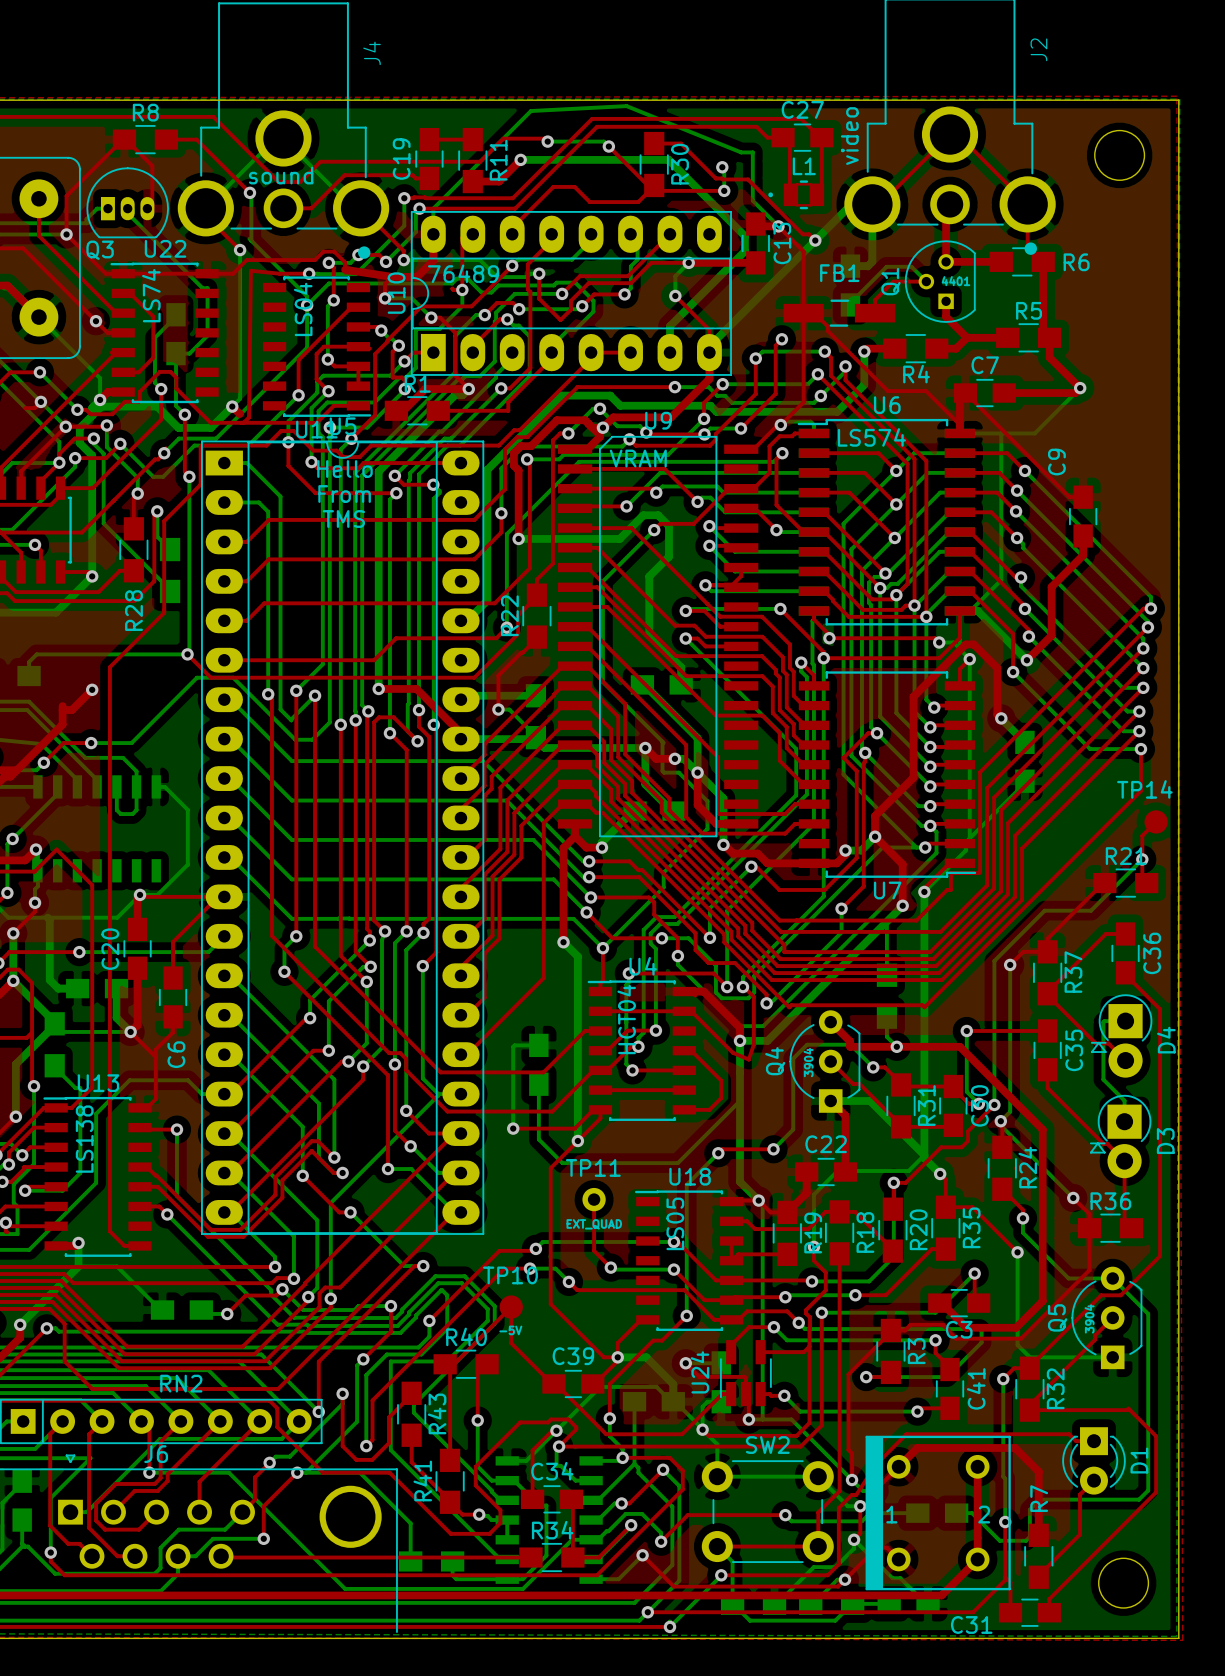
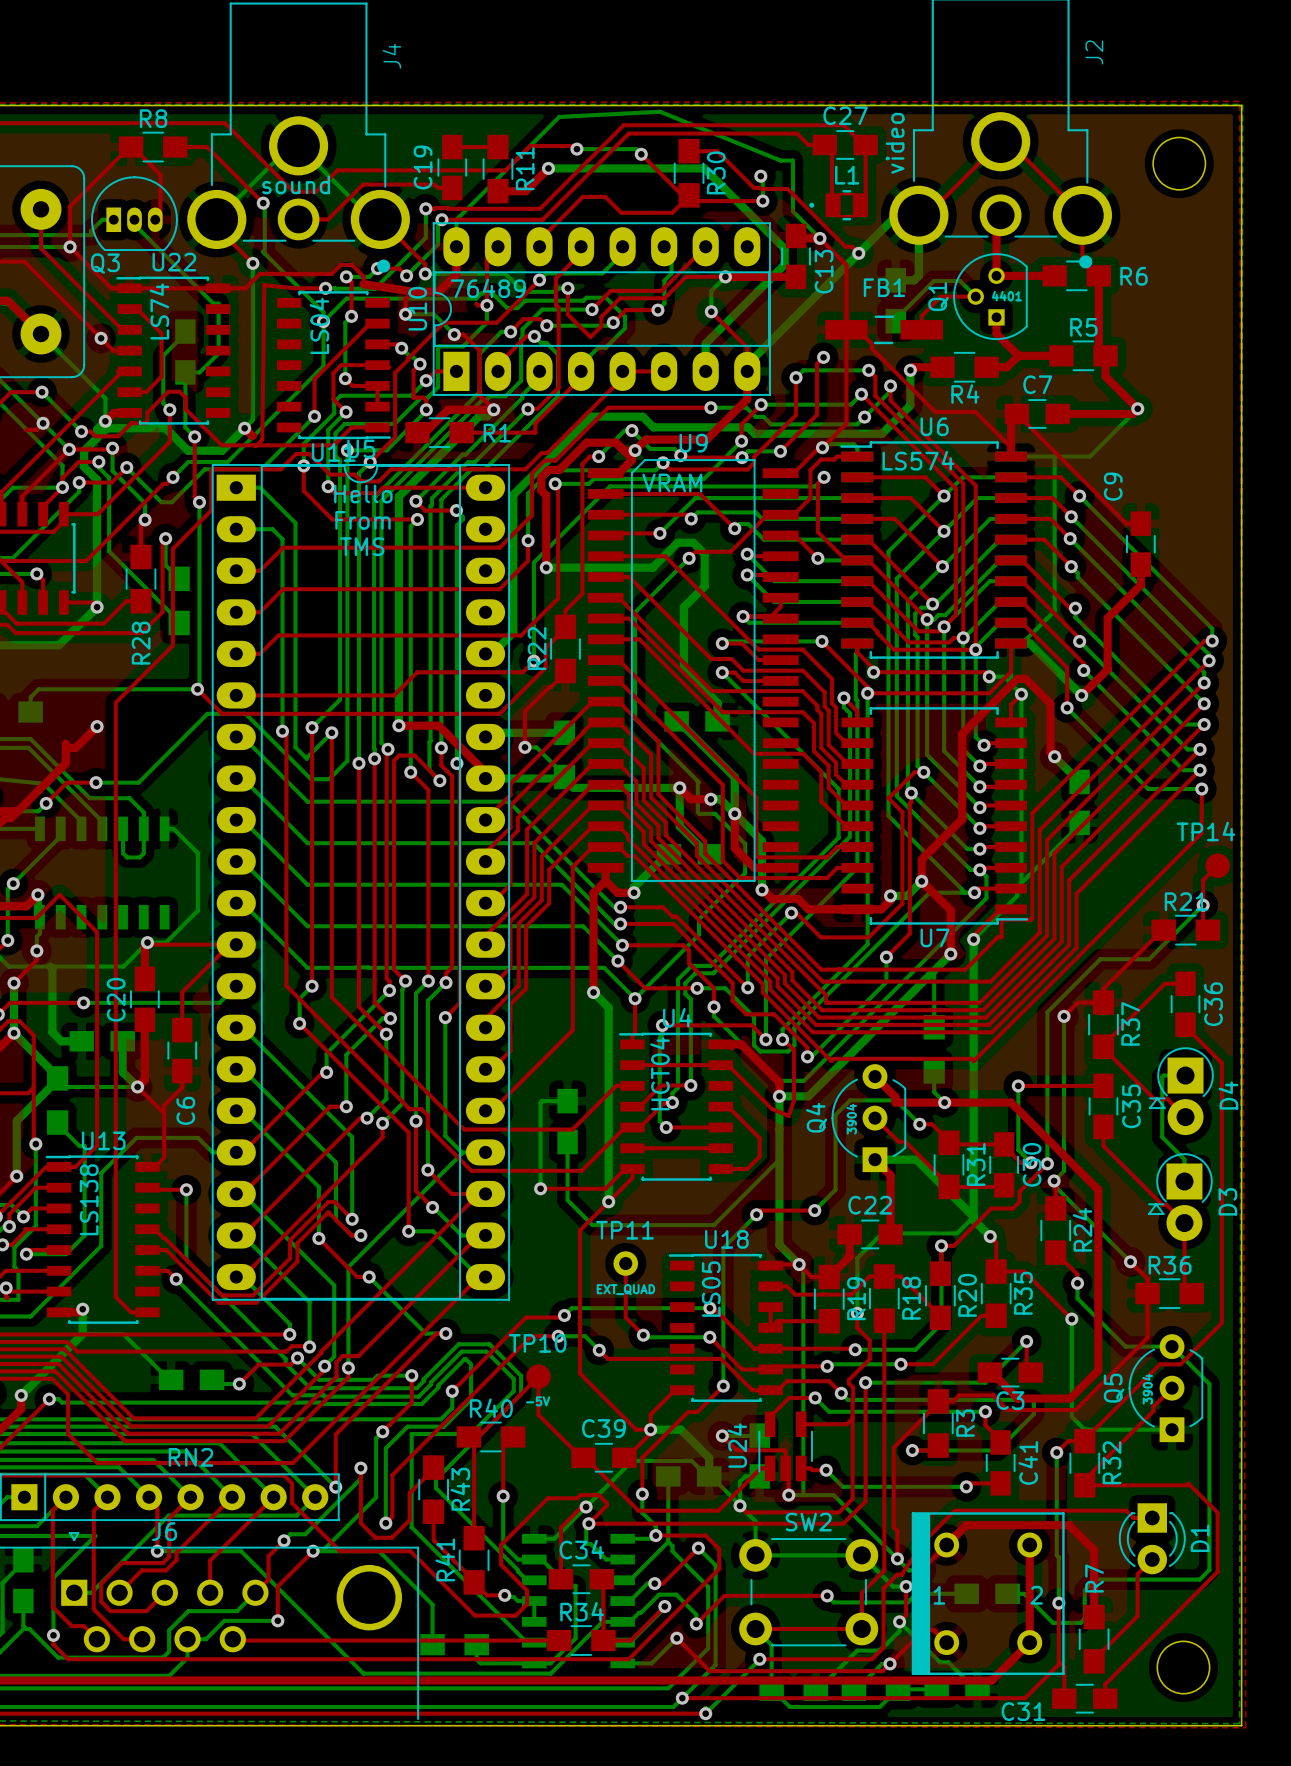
C13 name position: C13 (782, 243) -> C13 (824, 271)
R1 name position: R1 (417, 383) -> R1 (497, 433)

